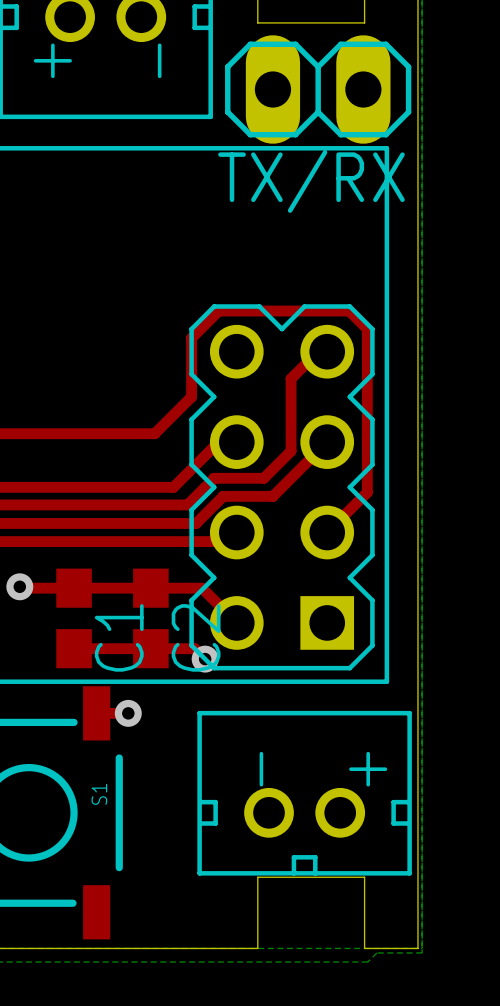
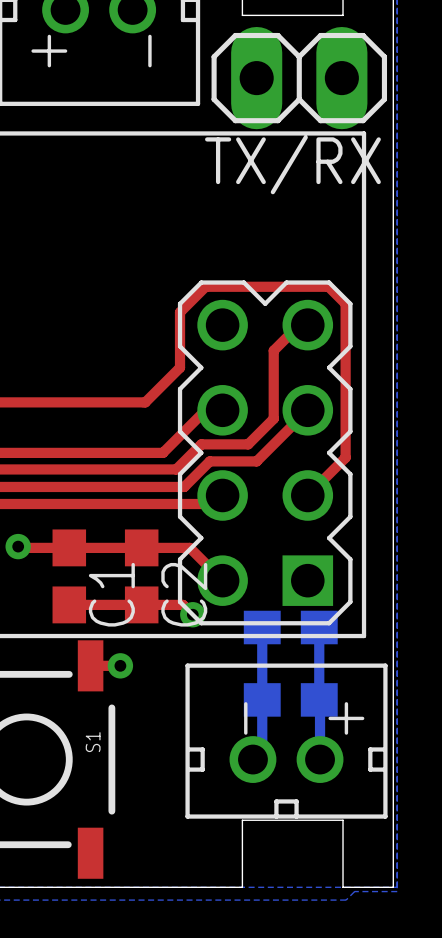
bottom track: none -> (262, 627) (262, 750) (252, 759)
part: none -> (290, 627)
bottom track: none -> (319, 627) (320, 759)
part: none -> (290, 699)

